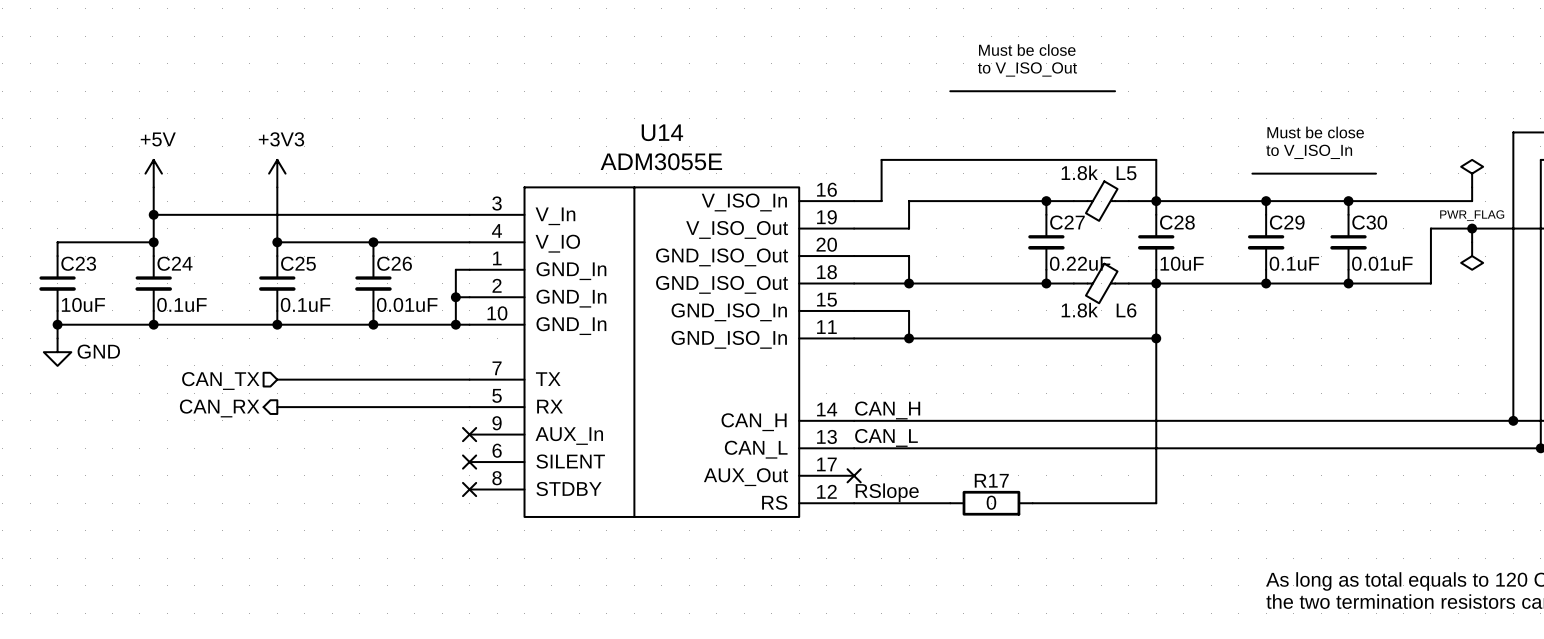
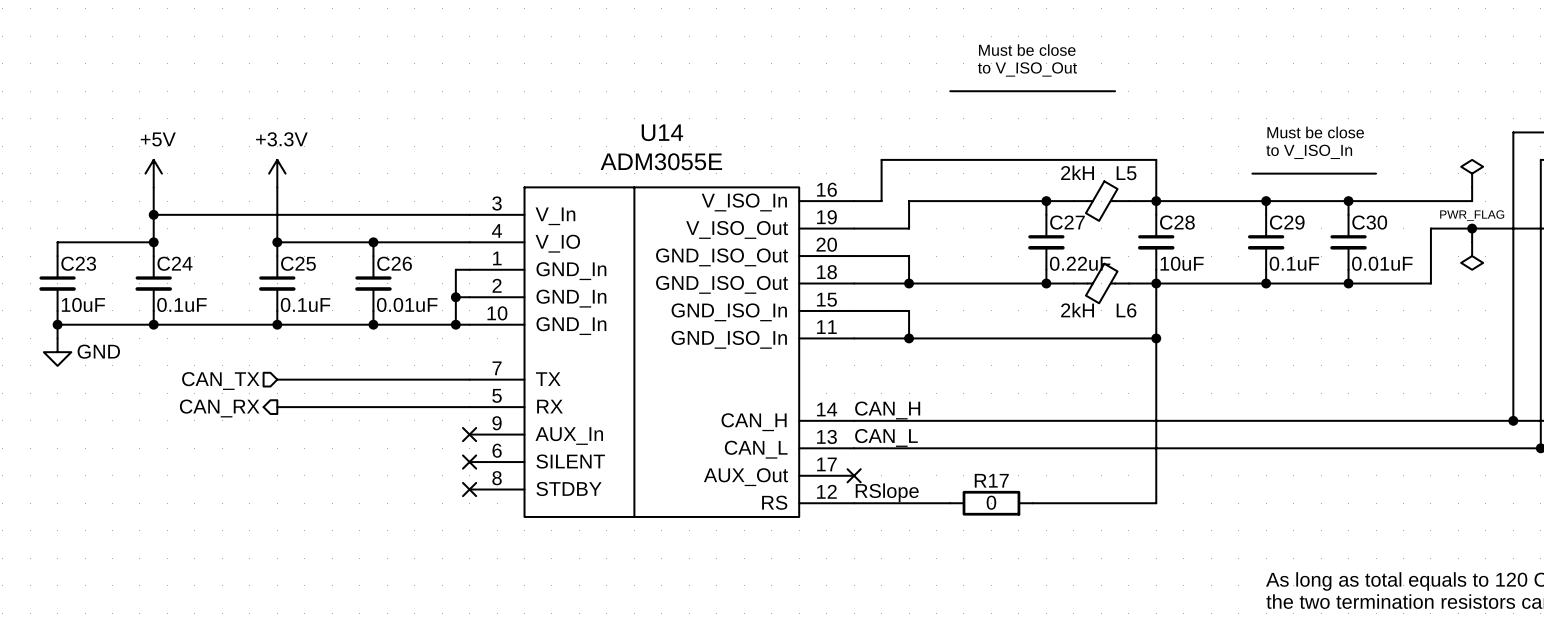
L5 value: 1.8k (1079, 172) -> 2kH (1077, 172)
power symbol: +3V3 (277, 173) -> +3.3V (277, 173)
L6 value: 1.8k (1079, 310) -> 2kH (1077, 310)

